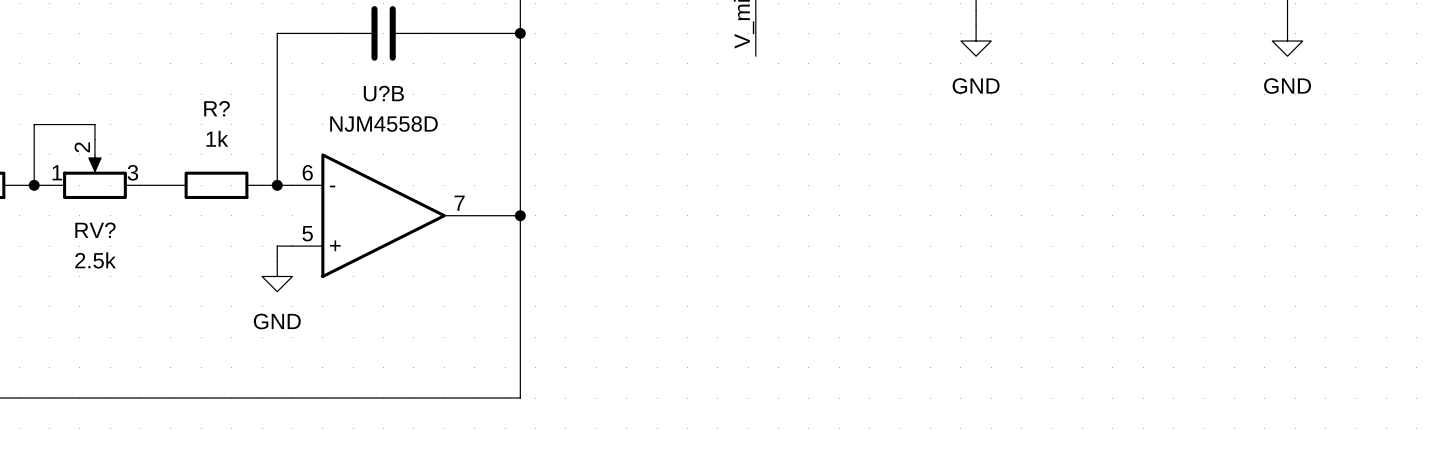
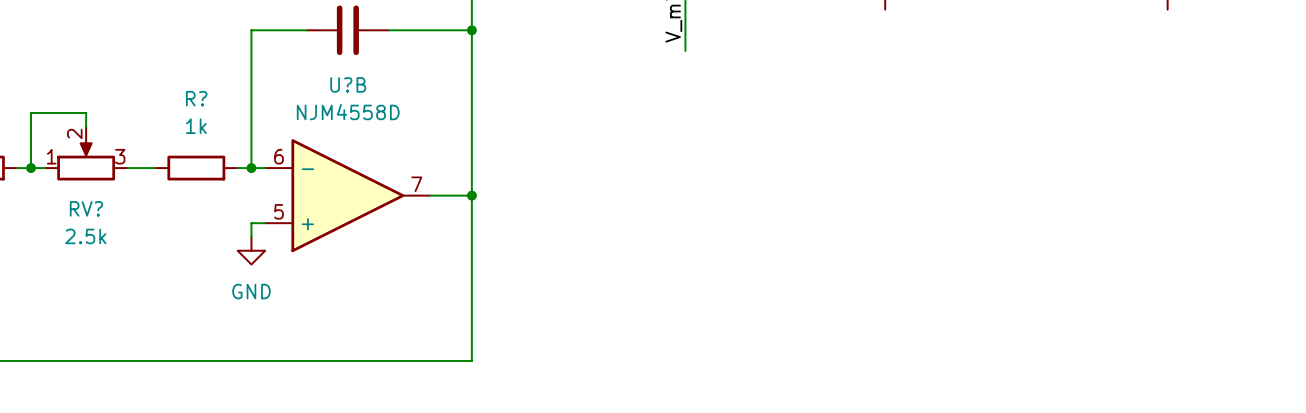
wire: (976, 10) (976, 25) -> none
wire: (1287, 10) (1287, 25) -> none
power symbol: GND (976, 41) -> none
power symbol: GND (1287, 41) -> none

